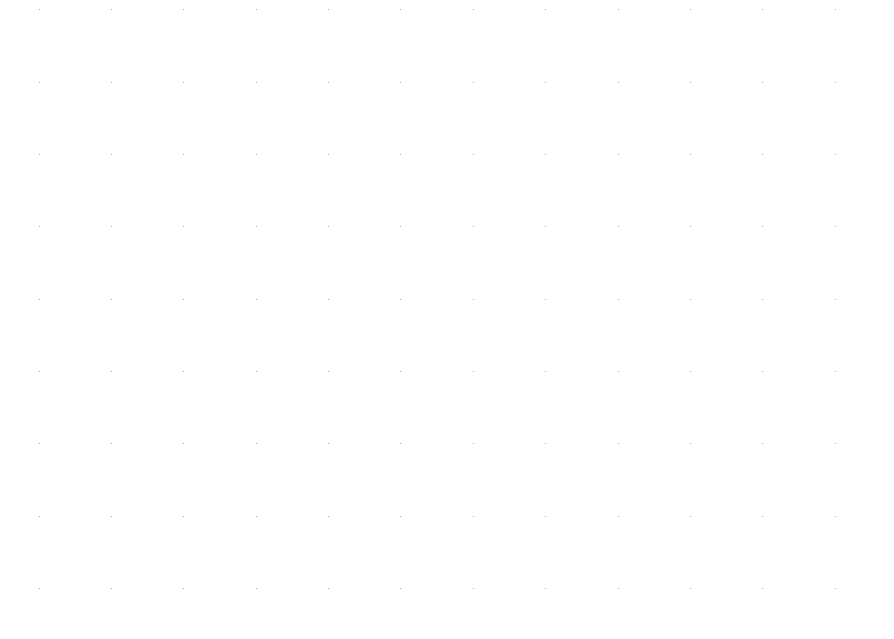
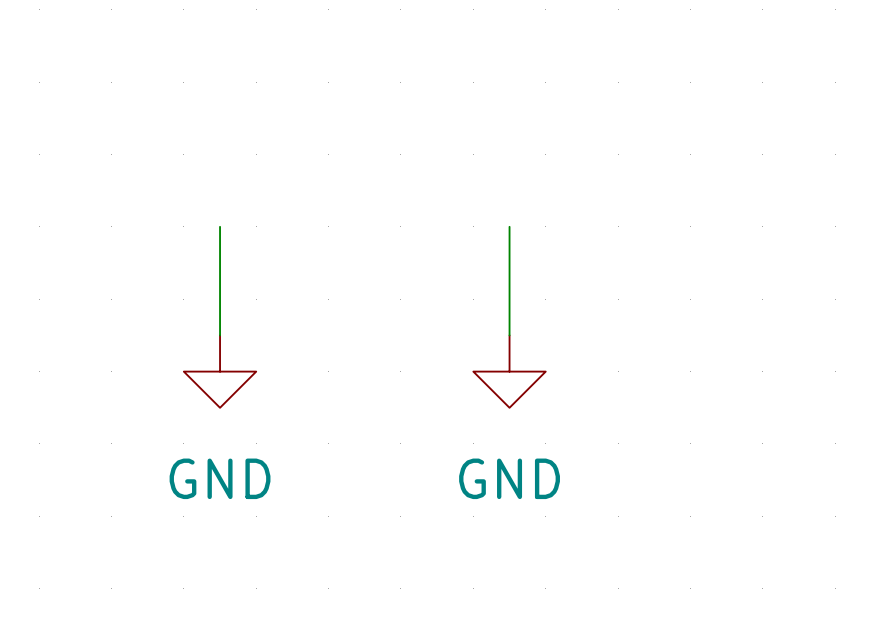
wire: none -> (220, 226) (220, 335)
wire: none -> (509, 226) (509, 335)
power symbol: none -> GND (220, 371)
power symbol: none -> GND (509, 371)

